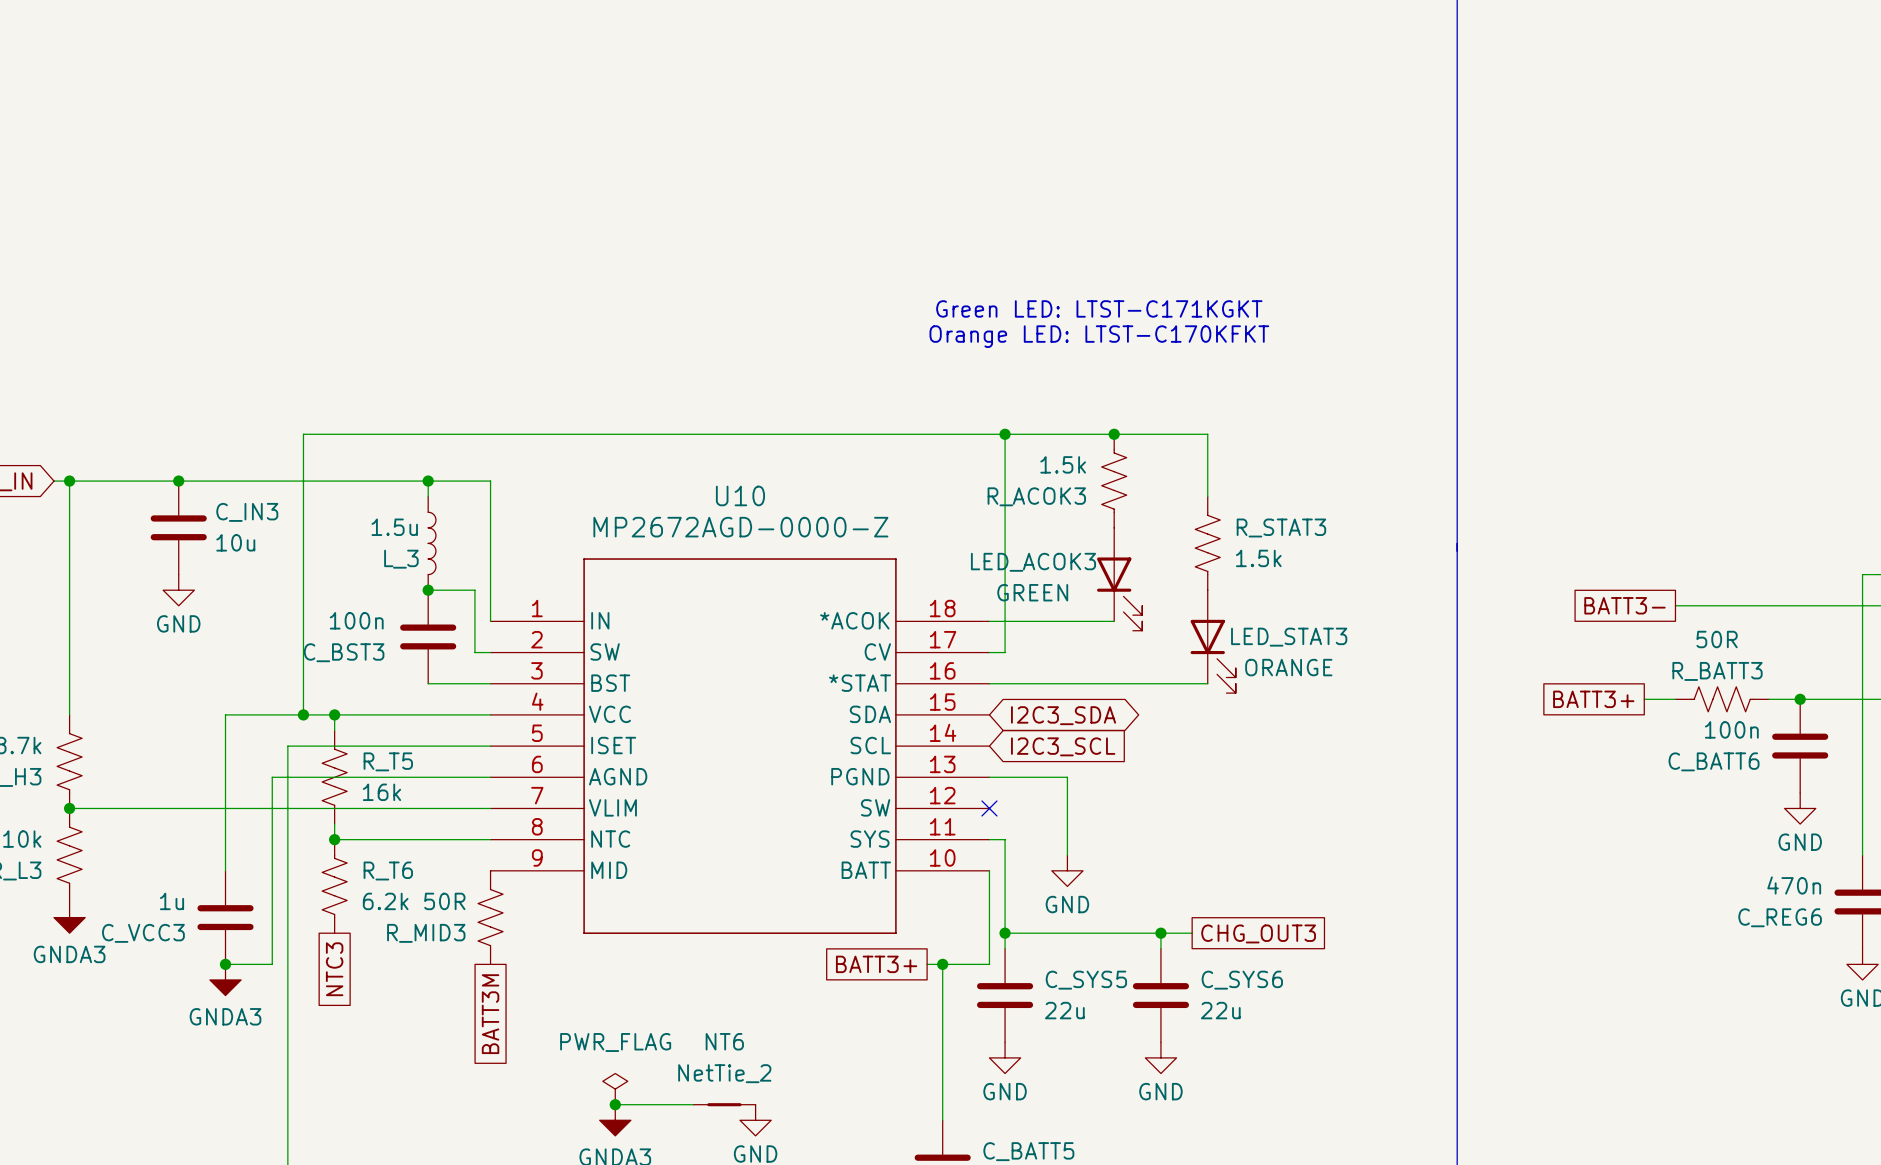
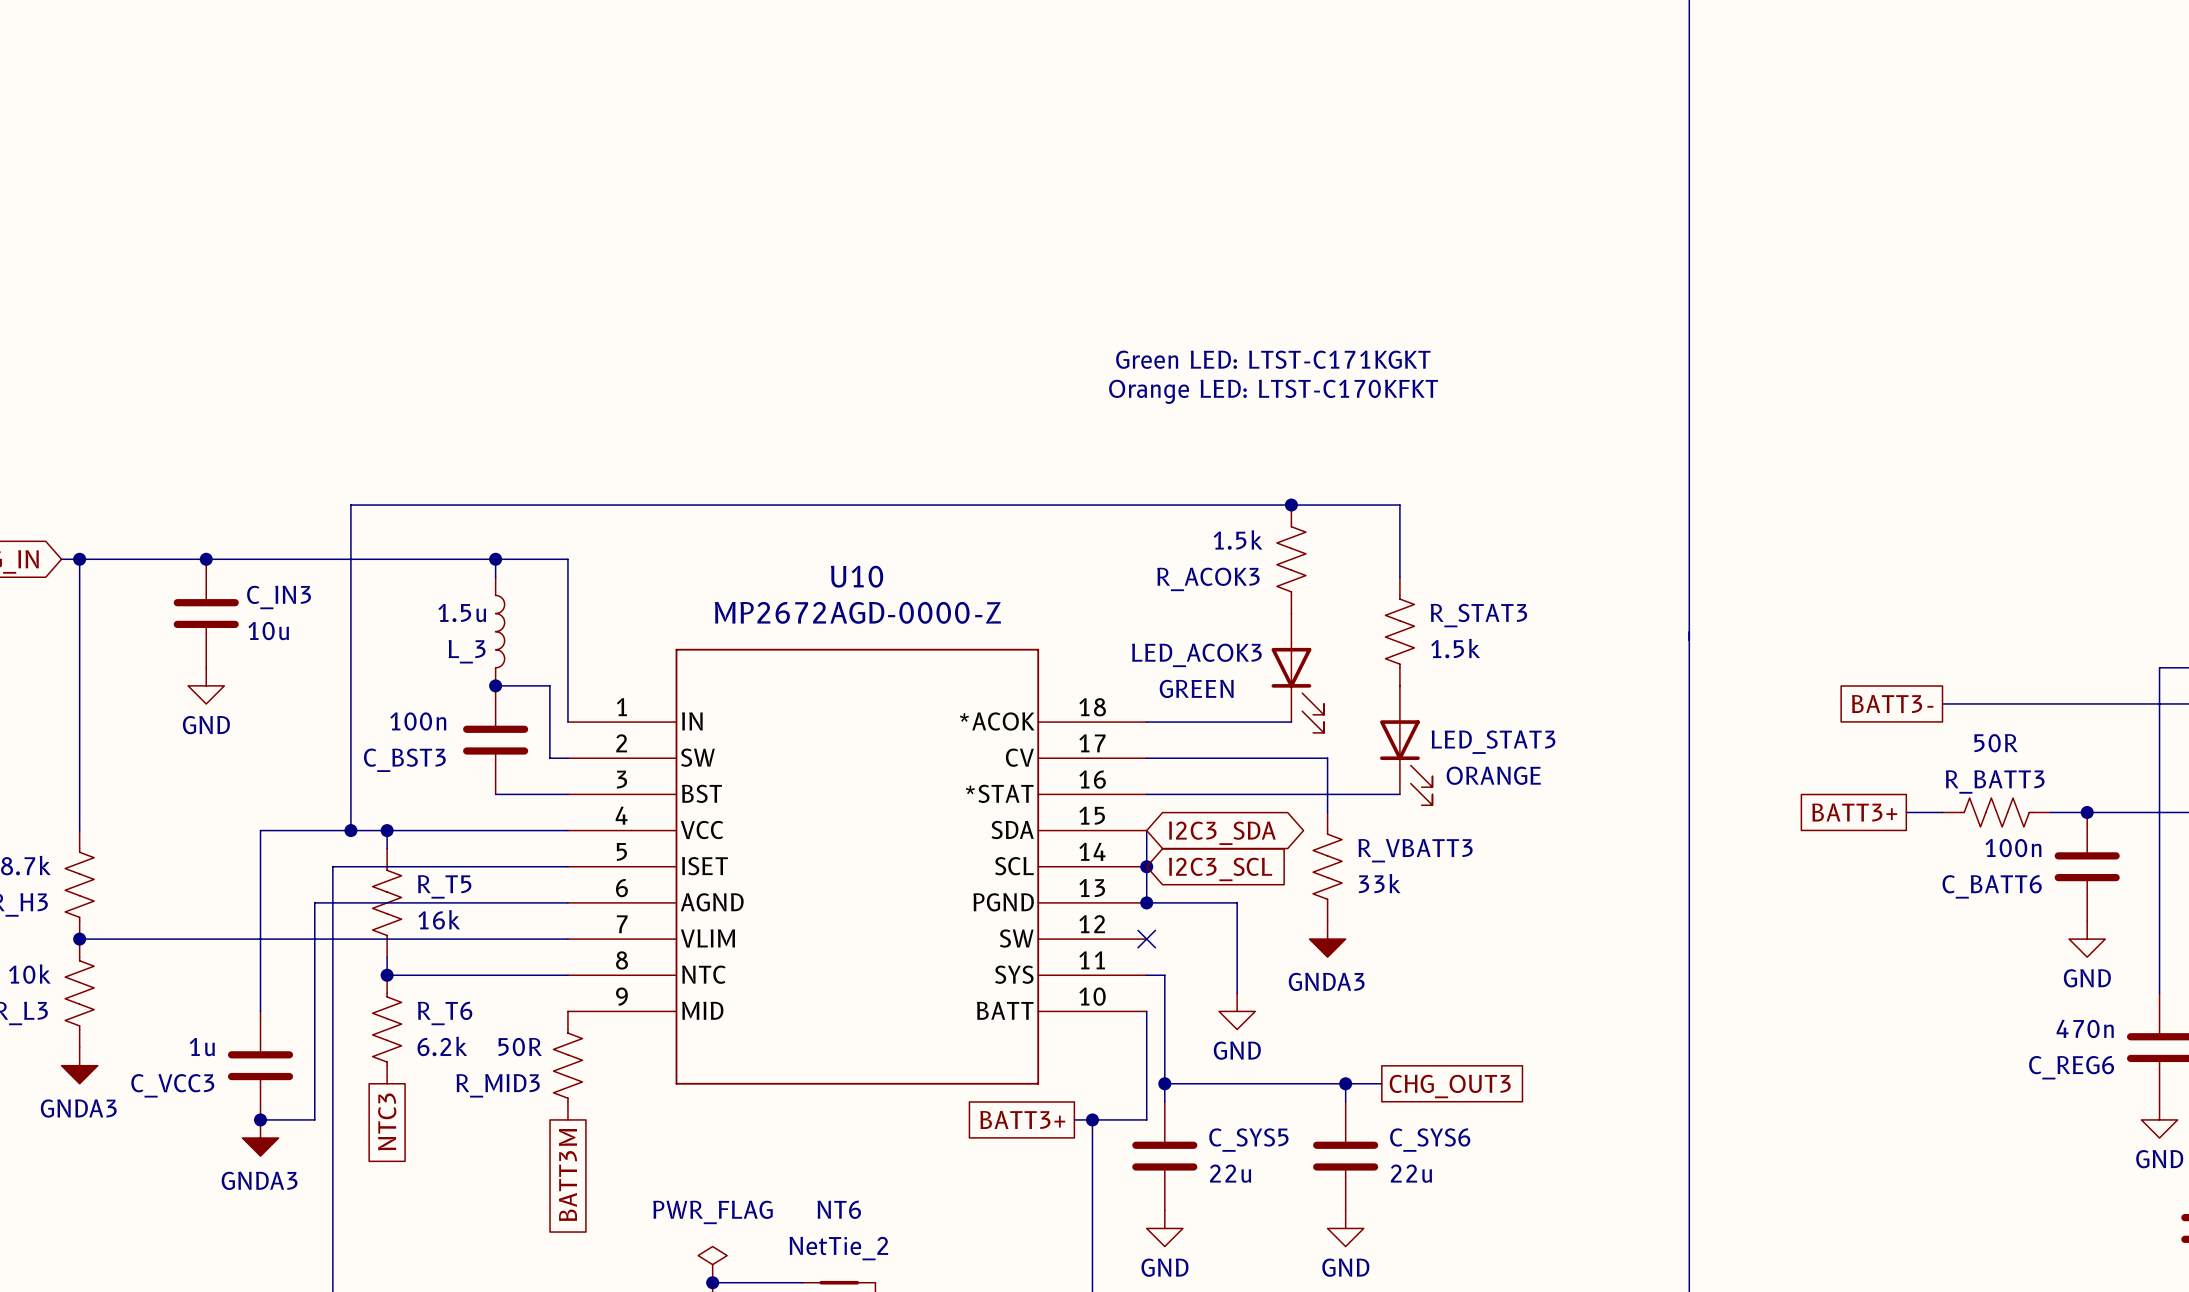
wire: (1005, 434) (1005, 652) -> (1327, 812) (1327, 758) (1164, 758)
junction: (1005, 434) -> none
wire: none -> (1146, 830) (1146, 902)
junction: none -> (1146, 866)
R_VBATT3: none -> 33k (1327, 866)
junction: none -> (1146, 902)
power symbol: none -> GNDA3 (1327, 939)

